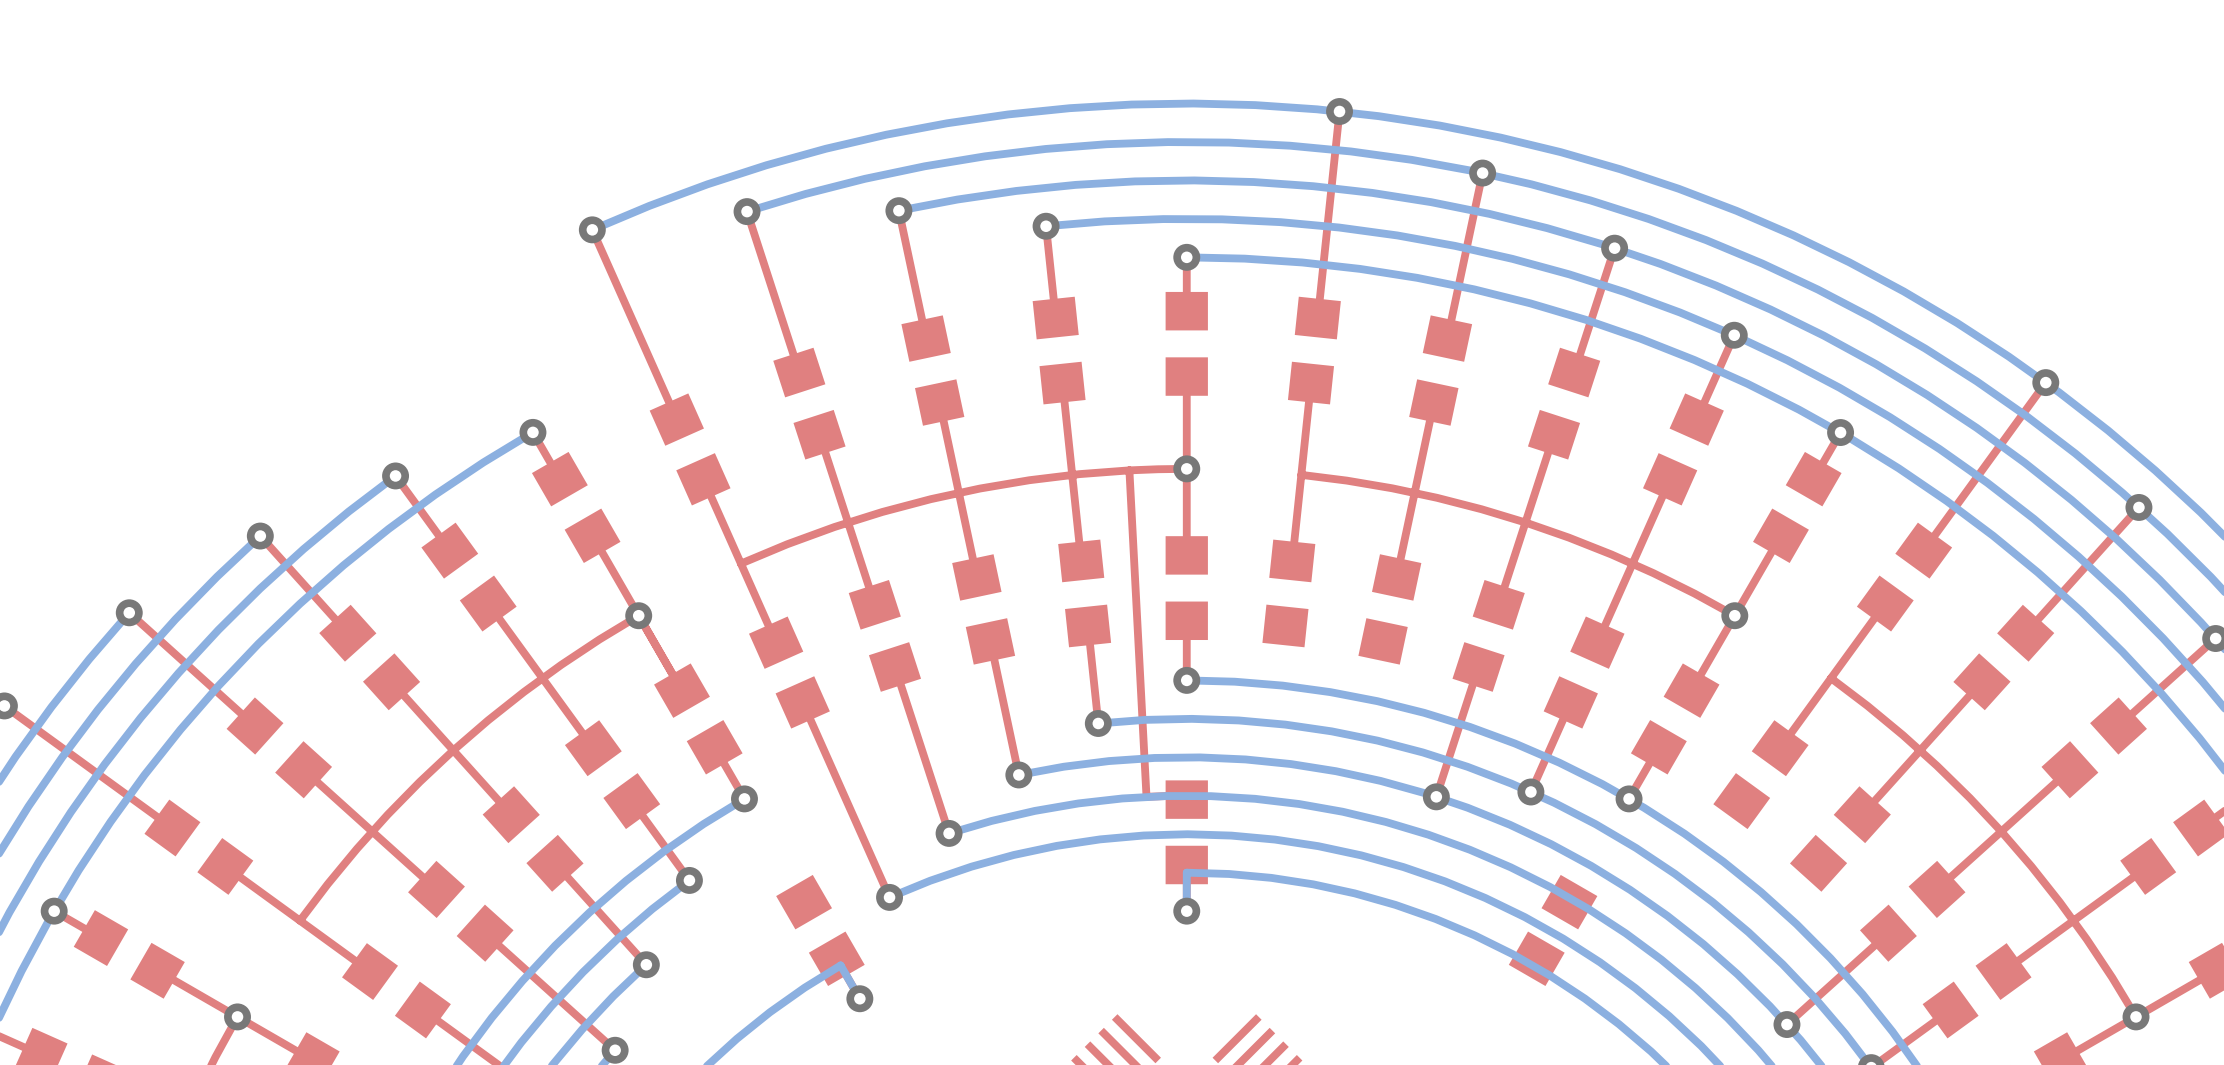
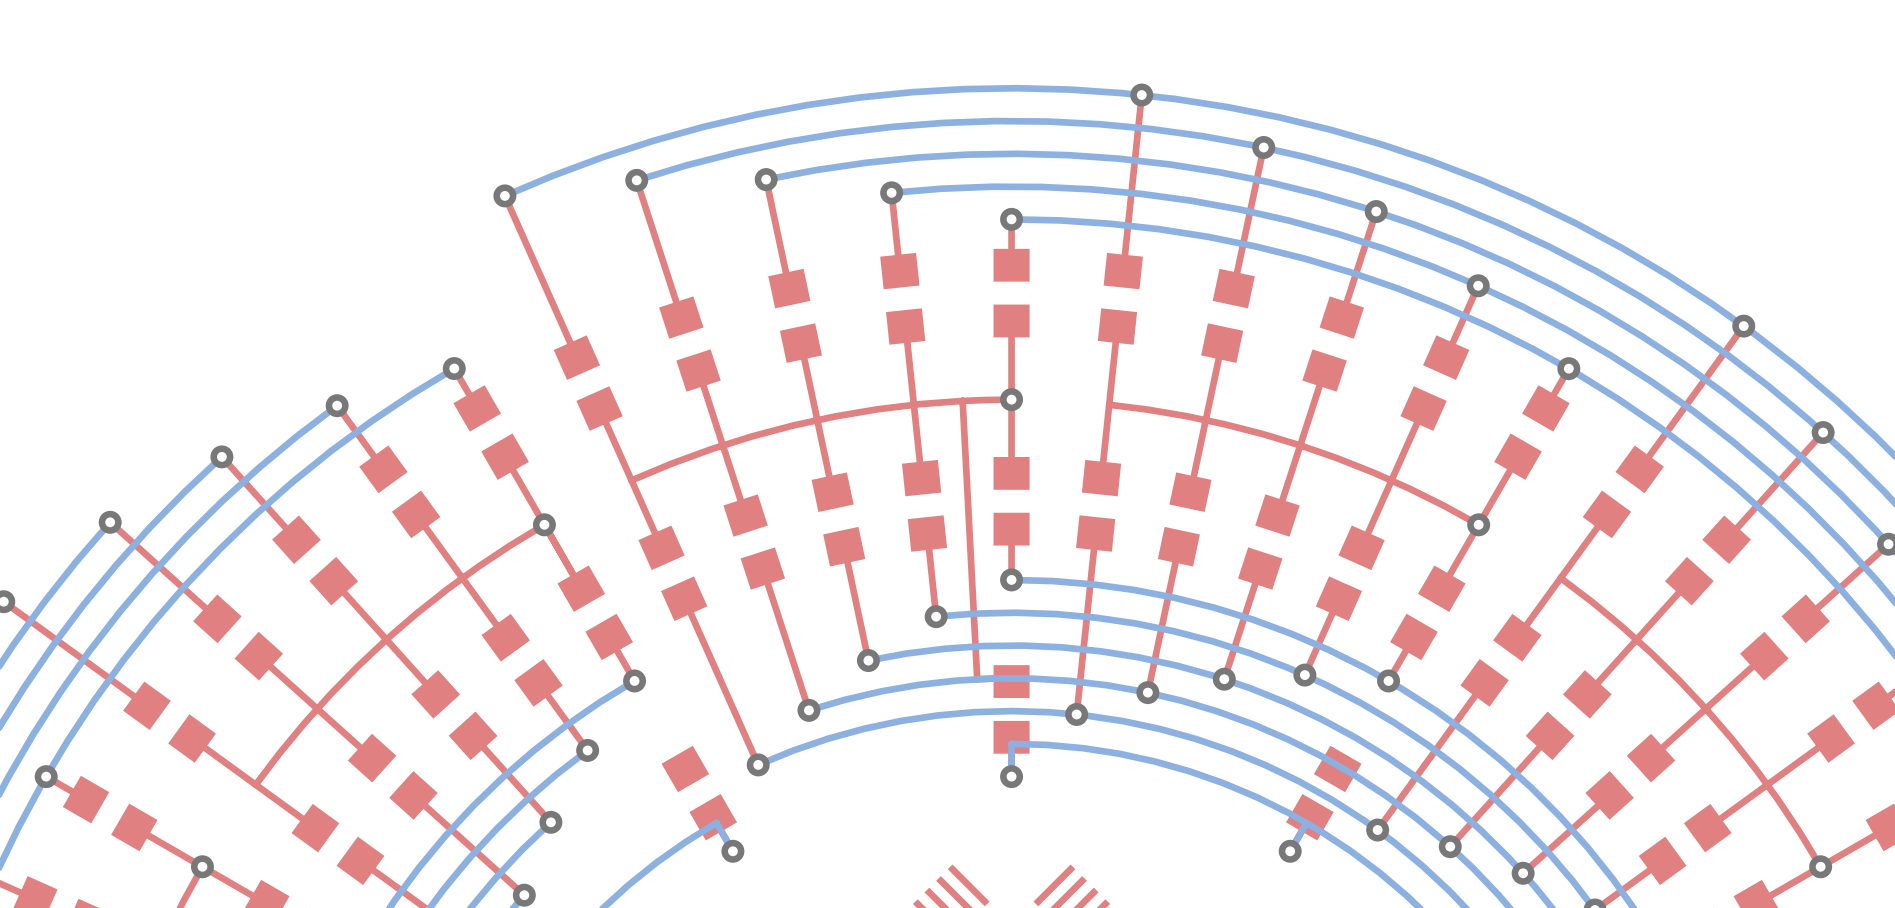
top track: none -> (1095, 533) (1076, 714)
top track: none -> (1178, 546) (1147, 692)
top track: none -> (1484, 682) (1377, 830)
via: none -> (1147, 692)
via: none -> (1076, 714)
top track: none -> (1550, 735) (1450, 846)
bottom track: none -> (1306, 823) (1290, 851)
via: none -> (1377, 830)
via: none -> (1450, 846)
via: none -> (1290, 851)

